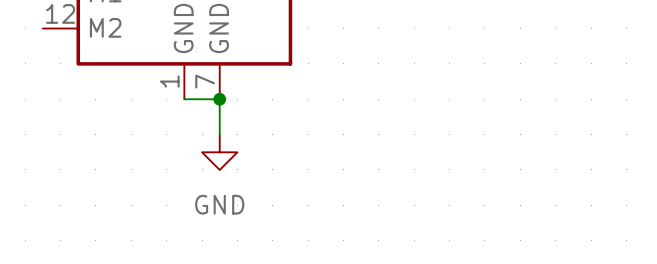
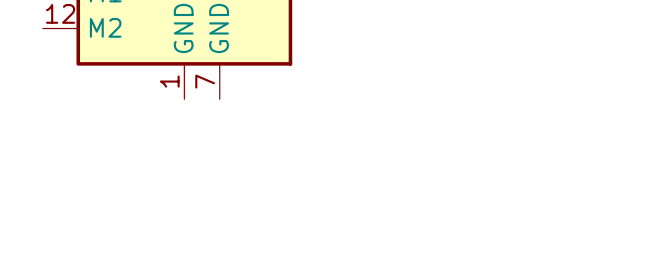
wire: (184, 99) (219, 99) (219, 134) -> none
junction: (219, 99) -> none
power symbol: GND (219, 152) -> none

